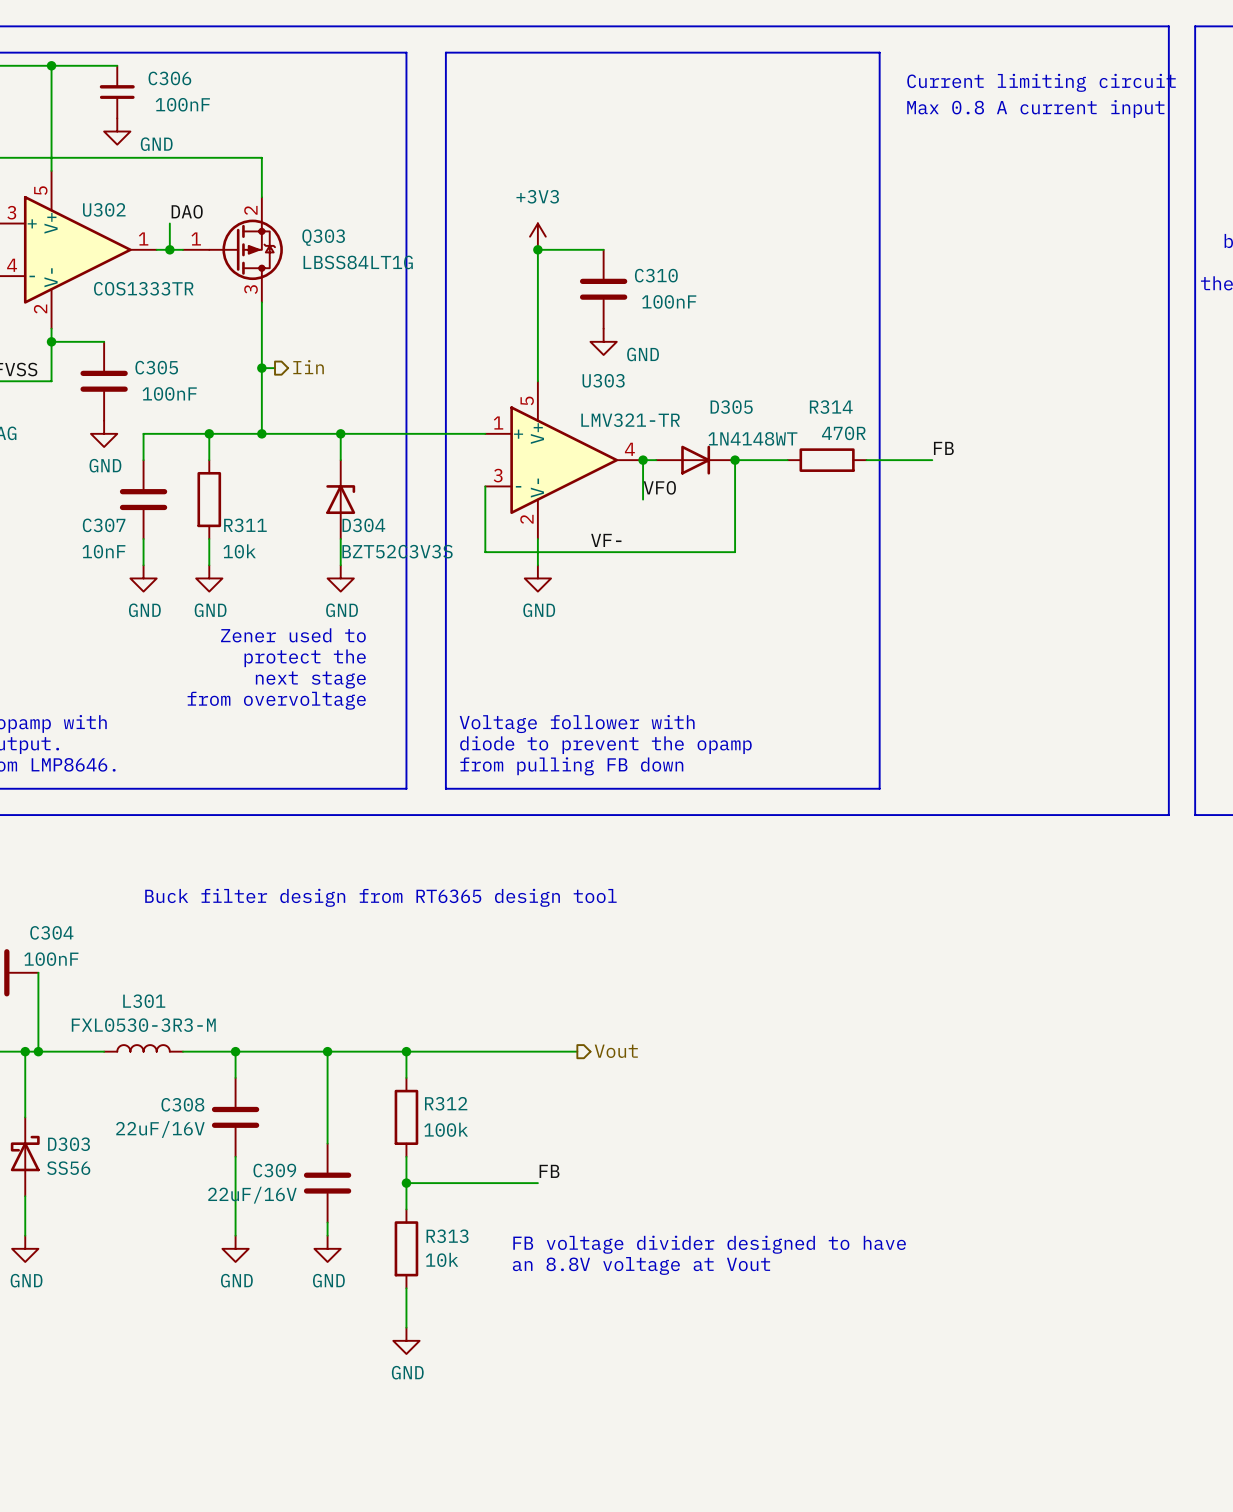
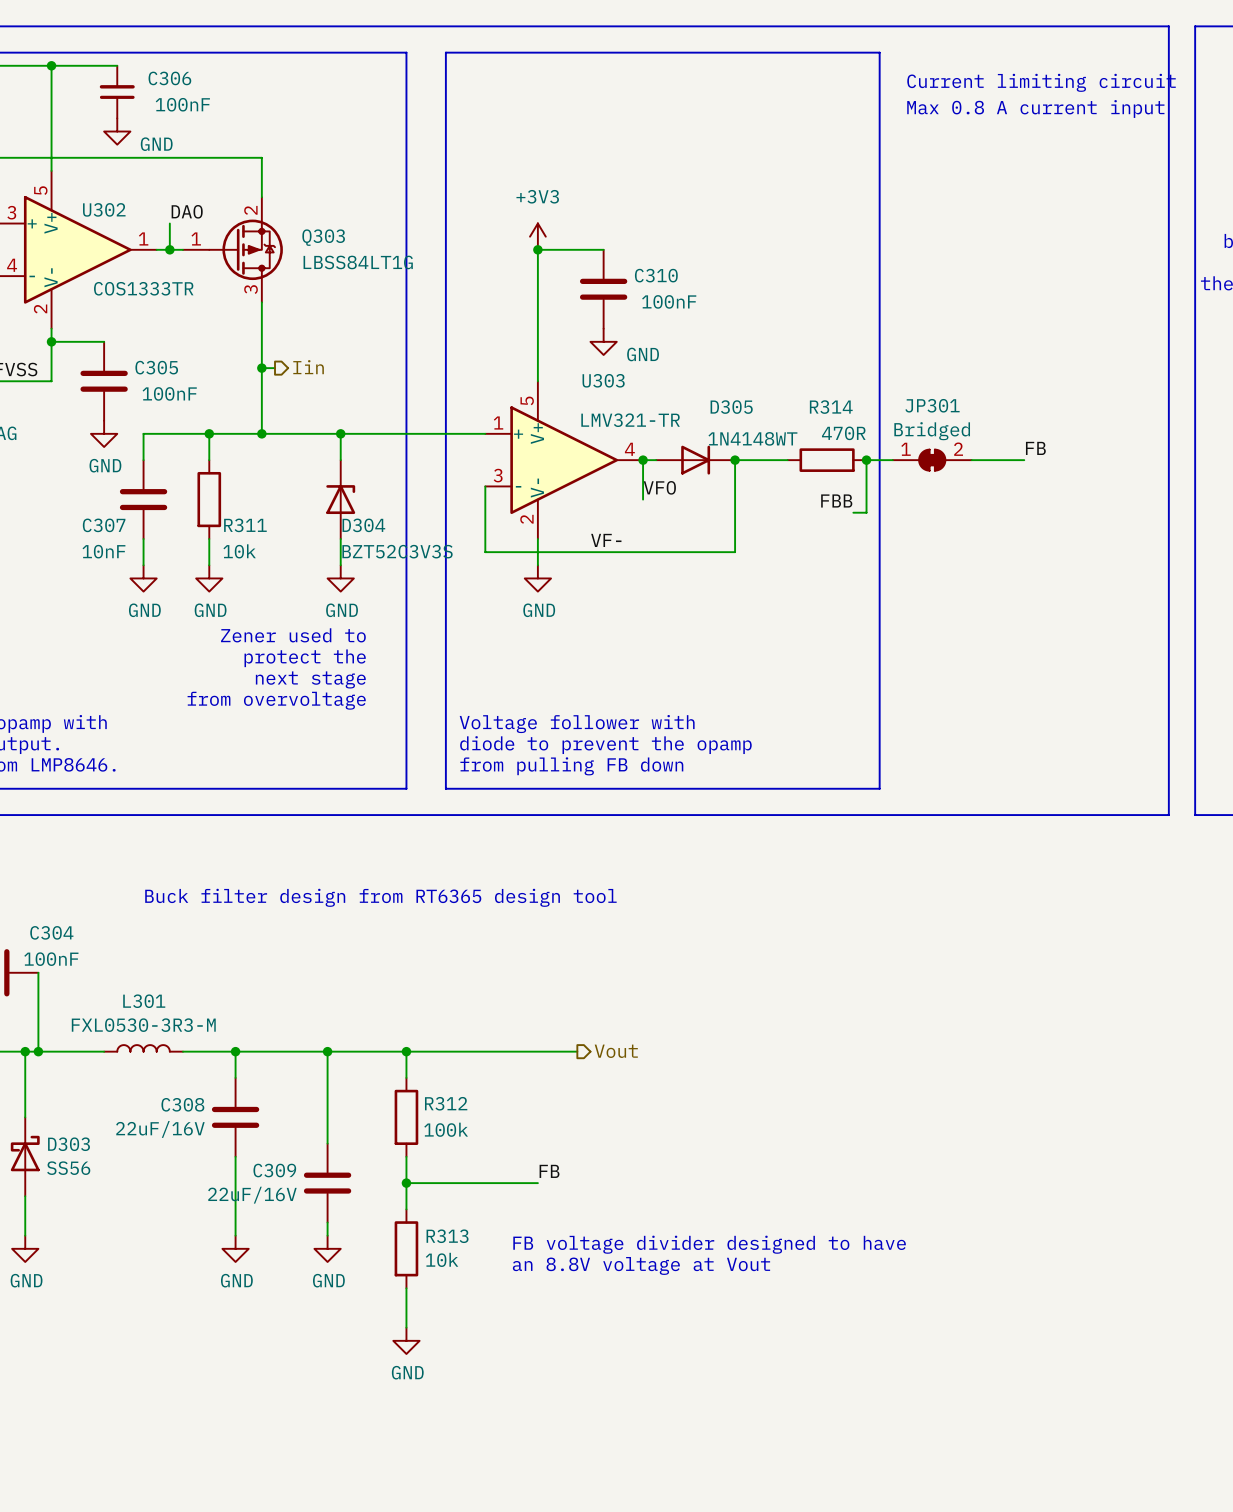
label position: FB (943, 448) -> FB (1035, 448)
wire: none -> (866, 460) (866, 512) (853, 512)
junction: none -> (866, 460)
JP301: none -> Bridged (932, 460)
wire: none -> (971, 460) (1024, 460)
label: none -> FBB (836, 500)

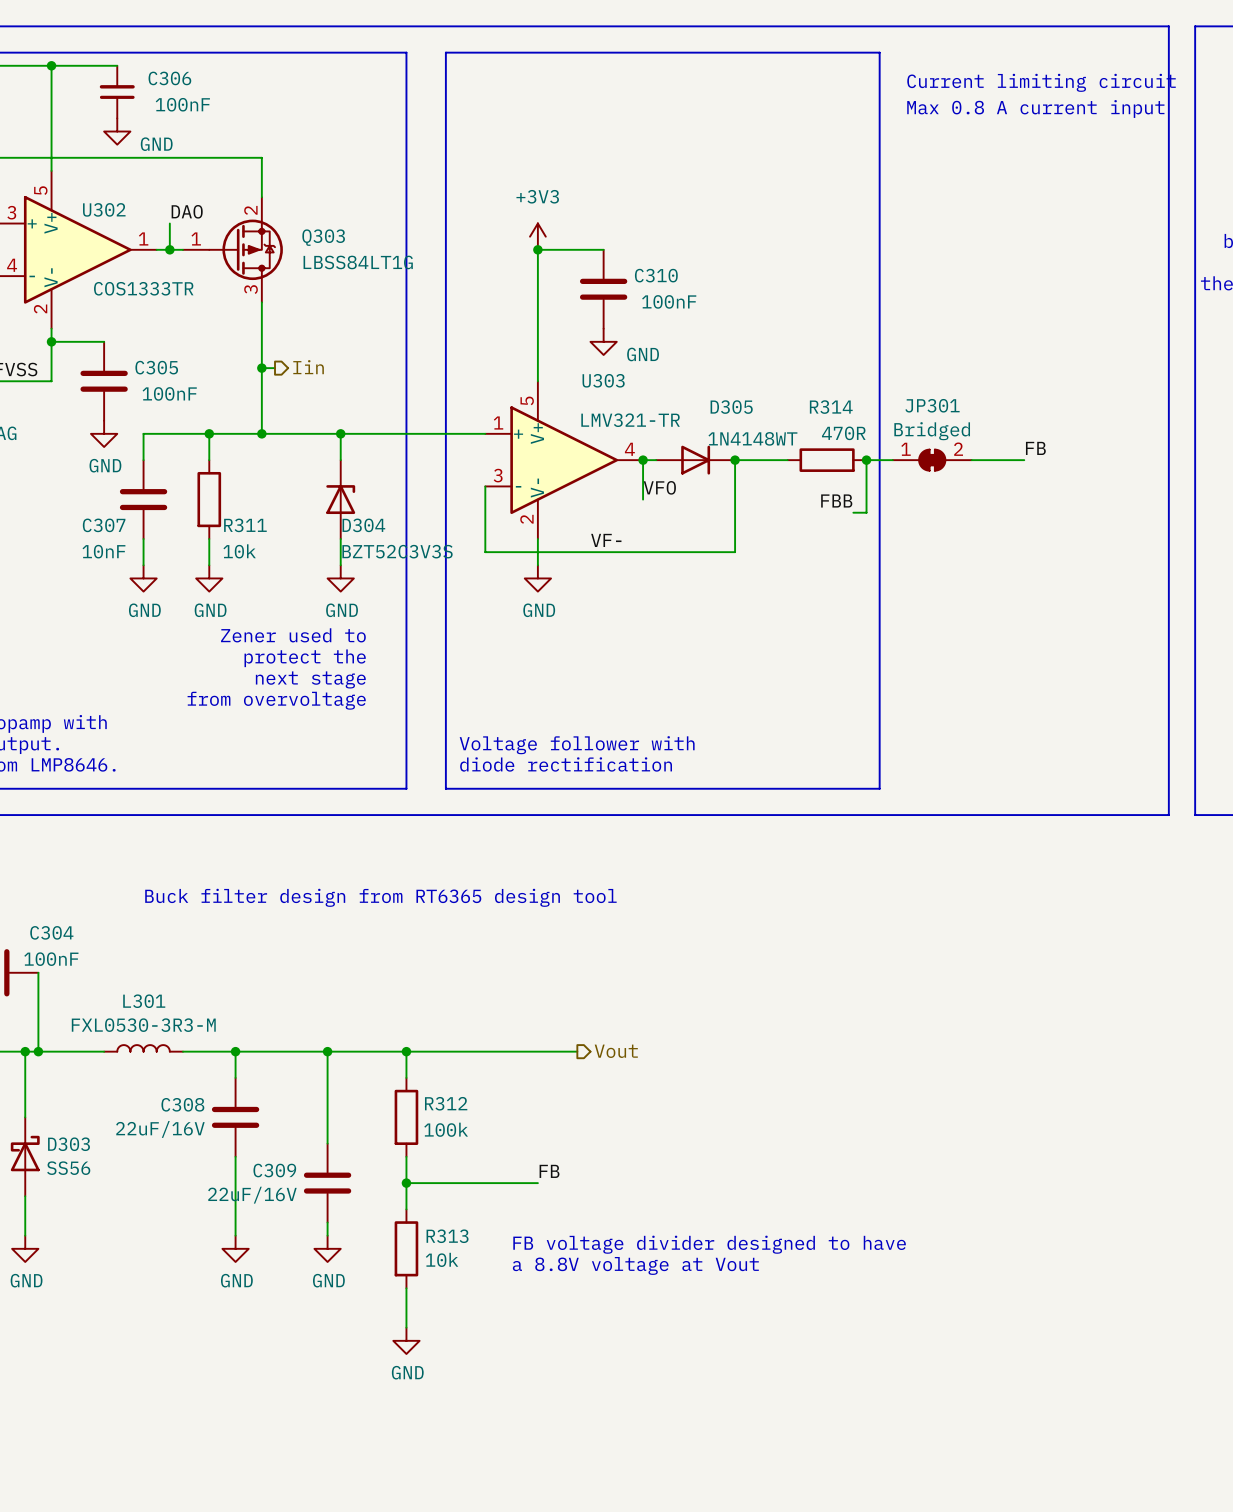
text: Voltage follower with (577, 724) -> none
text: diode to prevent the opamp (605, 745) -> Voltage follower with (577, 745)
text: from pulling FB down (571, 766) -> diode rectification (566, 764)
text: an 8.8V voltage at Vout (641, 1265) -> a 8.8V voltage at Vout (635, 1265)

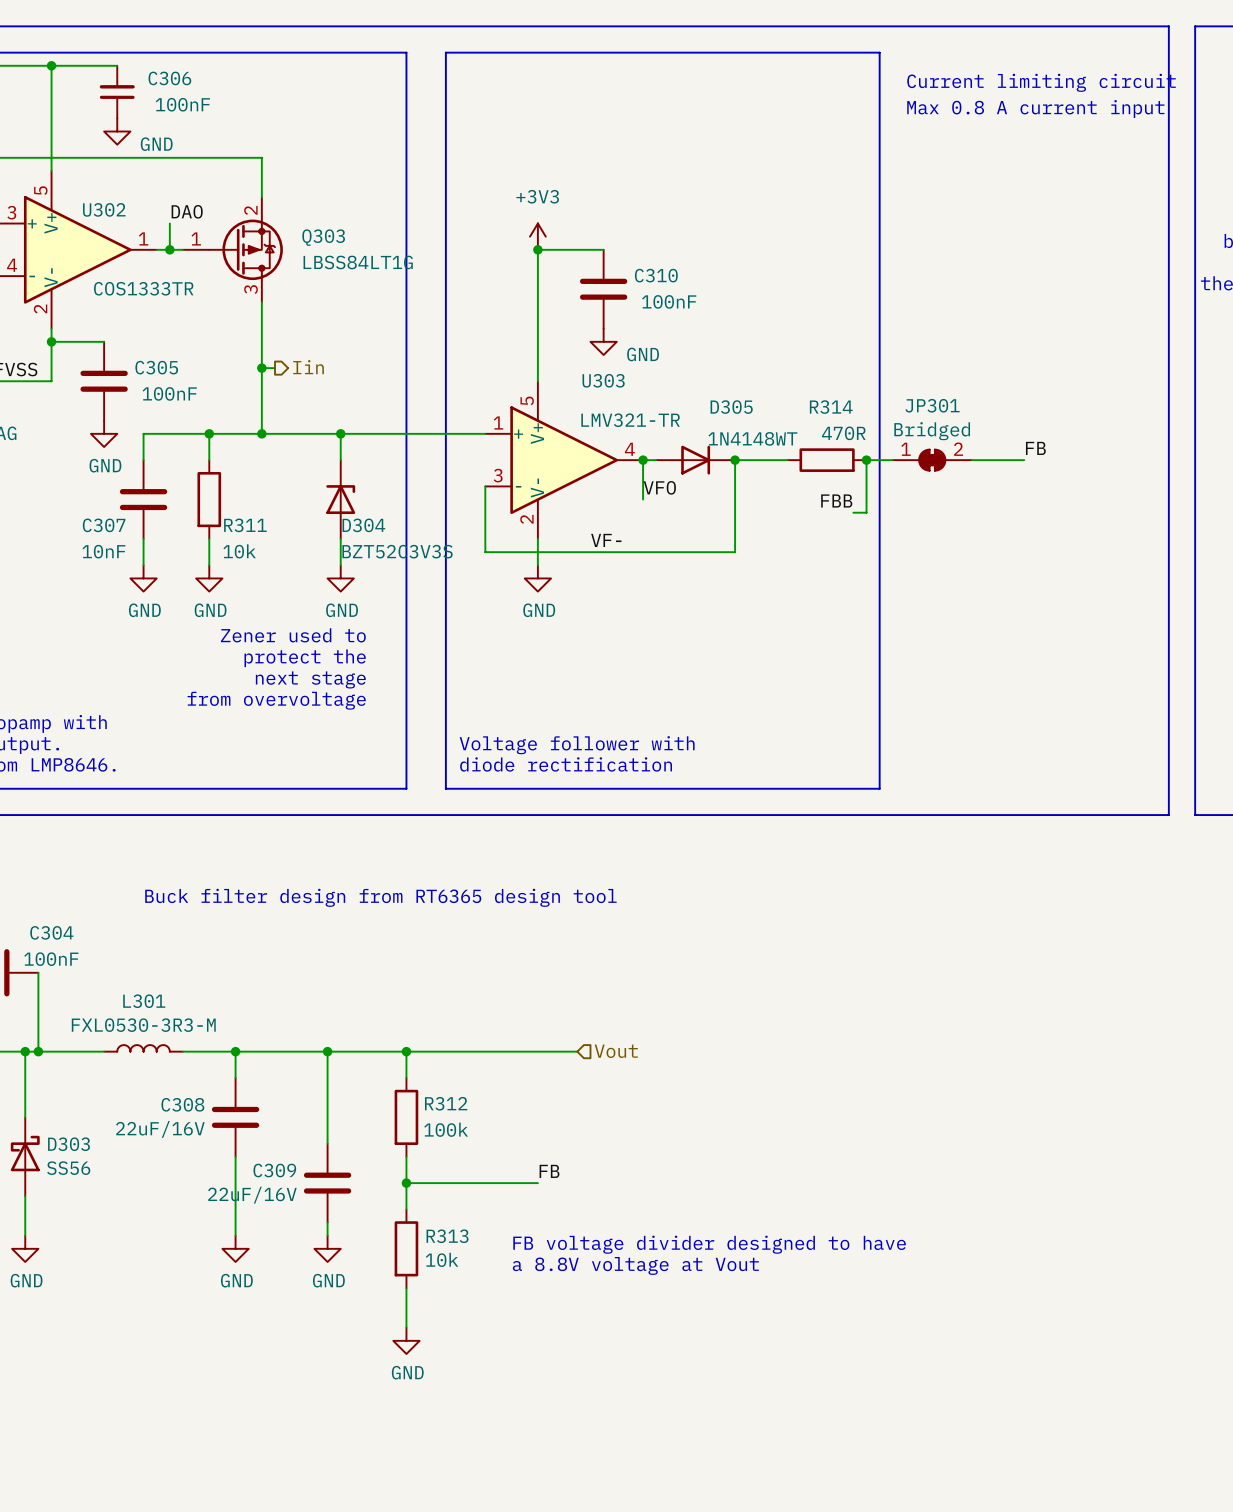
hierarchical label shape: output (616, 1051) -> input (616, 1051)

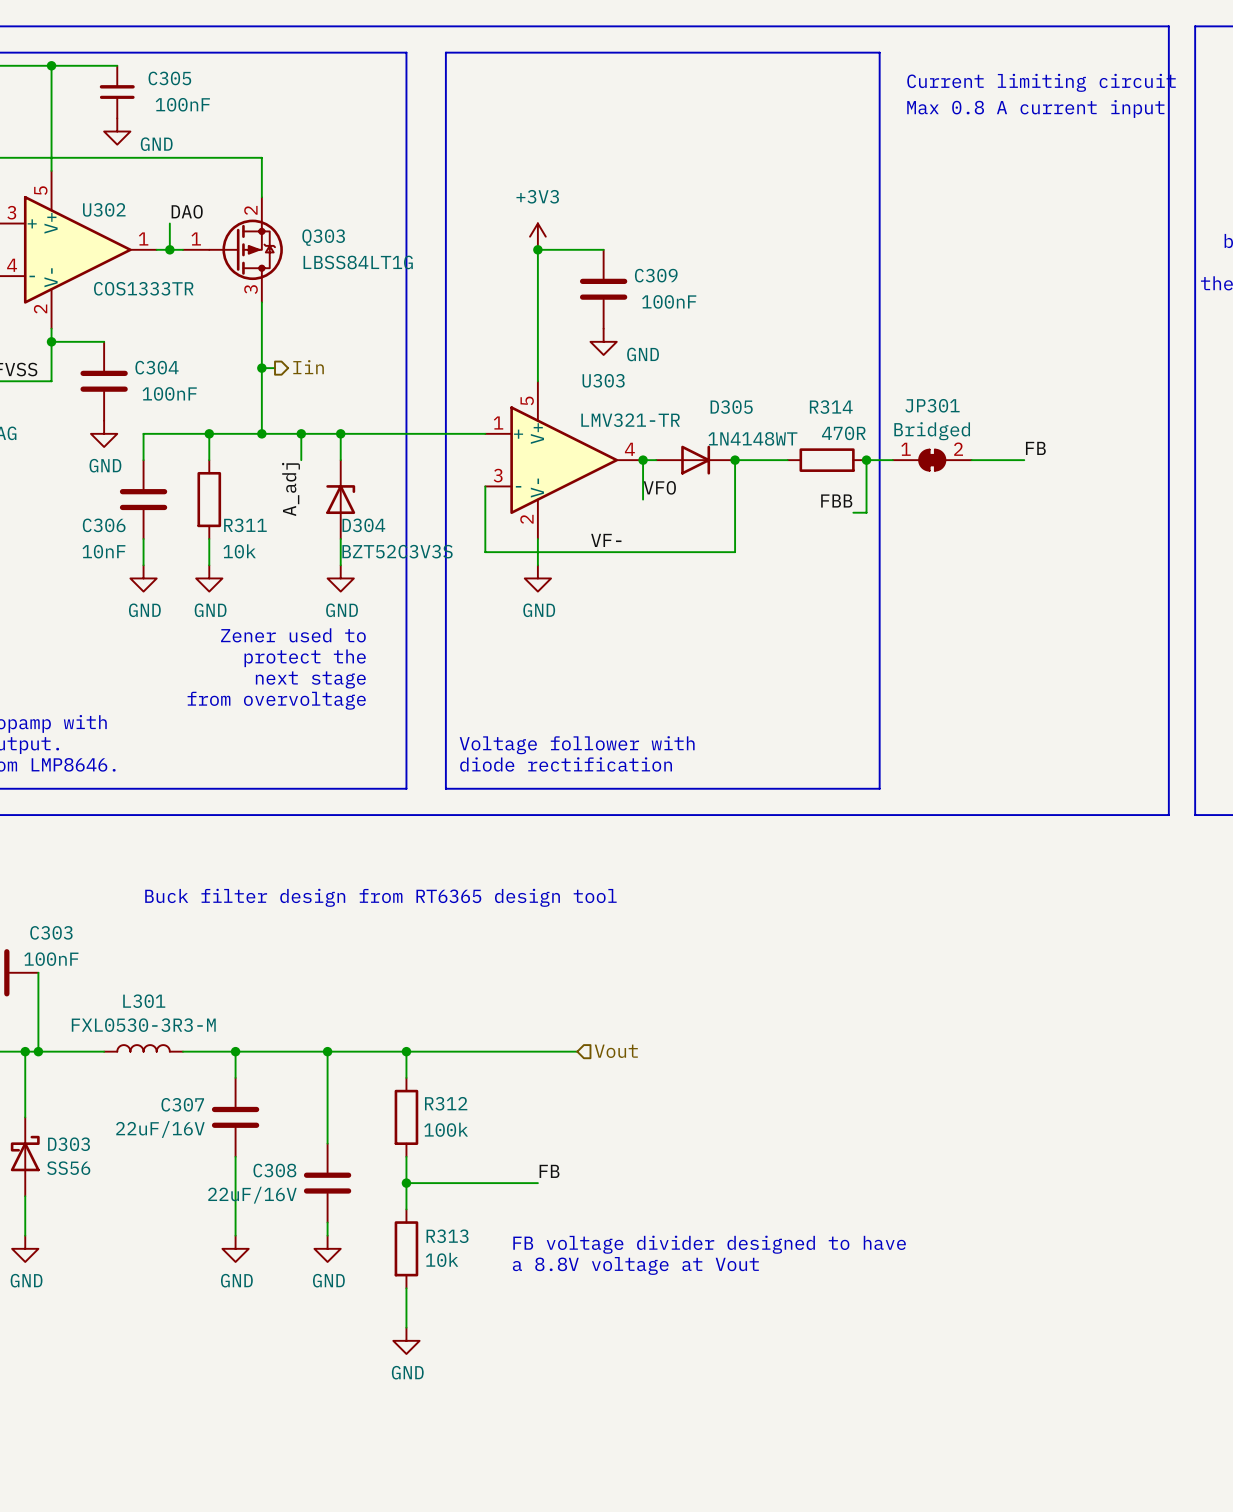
C306 name: C306 (169, 78) -> C305 (169, 78)
C310 name: C310 (656, 275) -> C309 (656, 275)
C305 name: C305 (156, 367) -> C304 (157, 367)
wire: none -> (301, 433) (301, 460)
junction: none -> (301, 433)
label: none -> A_adj (290, 489)
C307 name: C307 (104, 525) -> C306 (104, 525)
C304 name: C304 (51, 932) -> C303 (51, 932)
C308 name: C308 (182, 1104) -> C307 (182, 1104)
C309 name: C309 (274, 1170) -> C308 (274, 1170)

